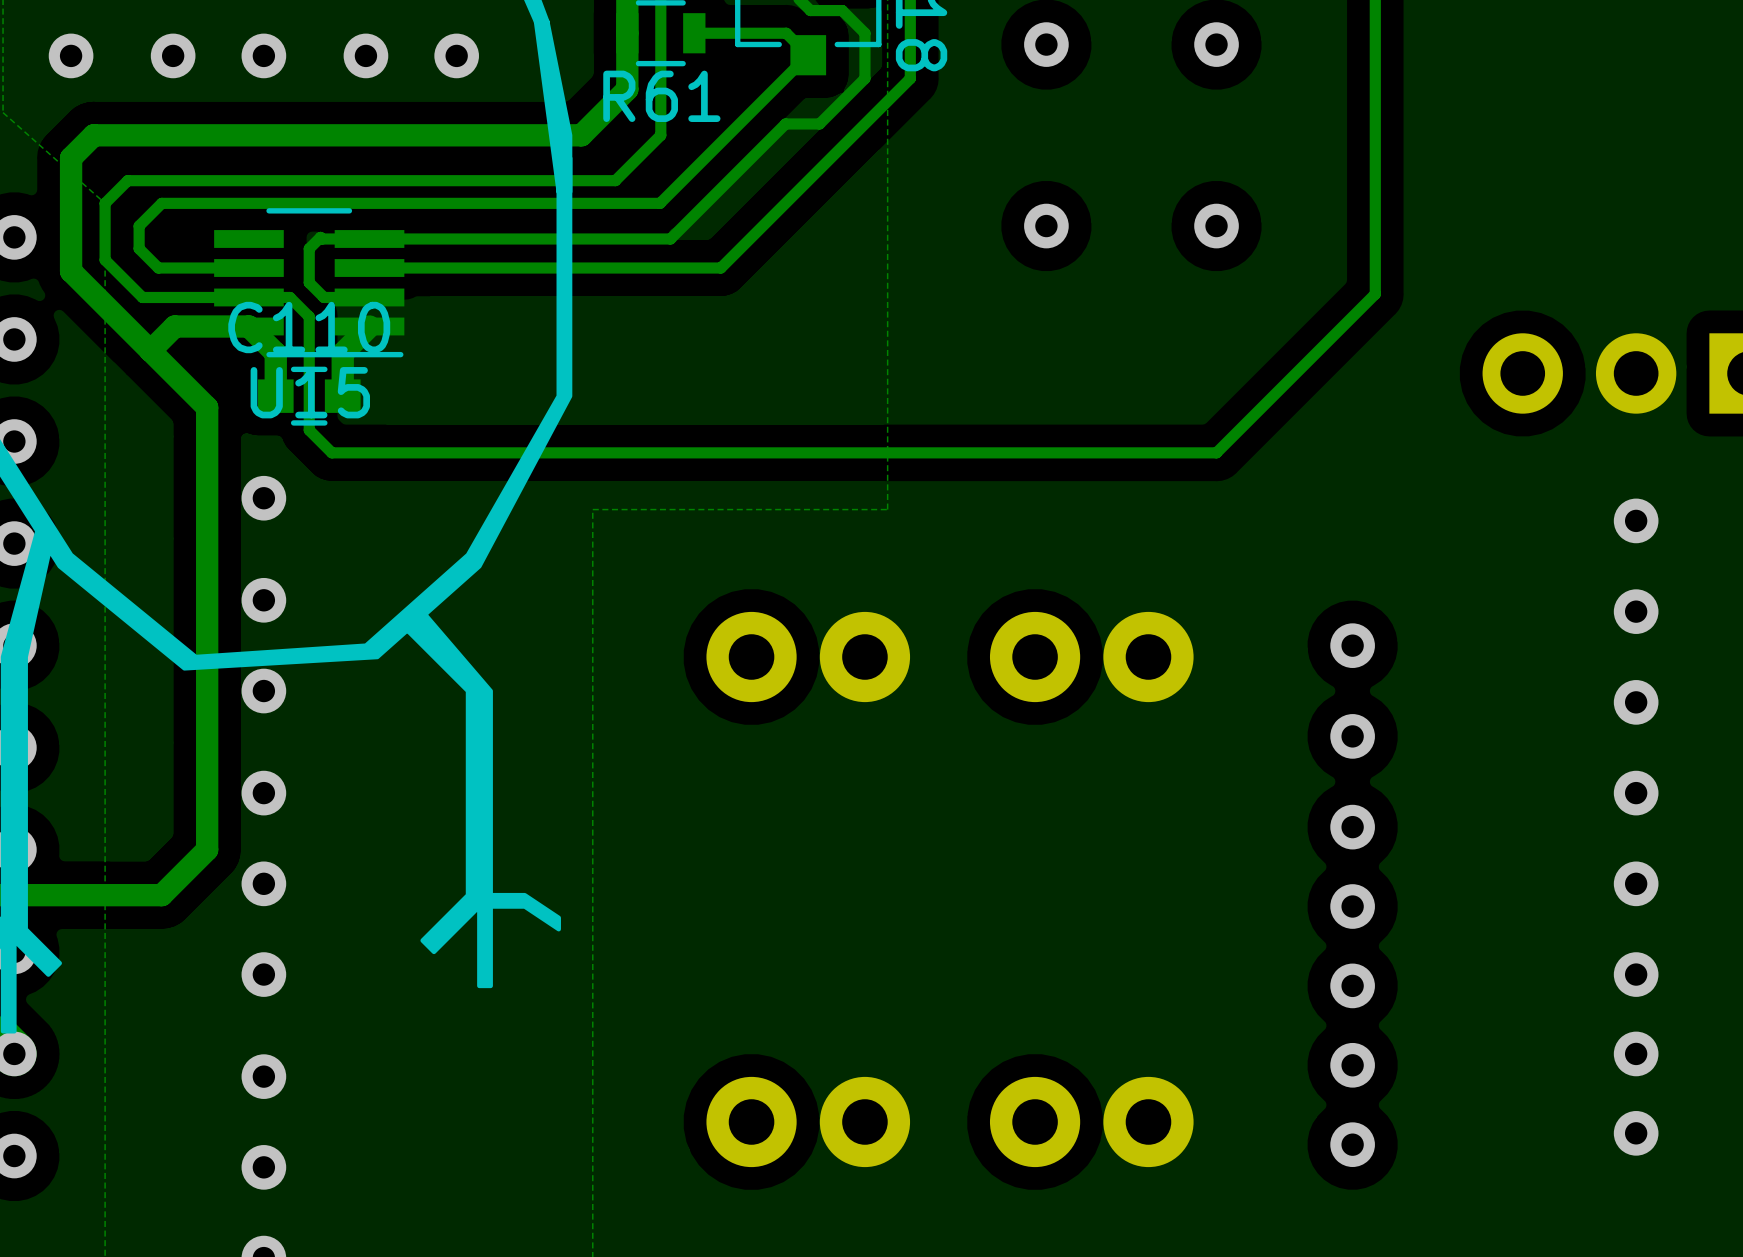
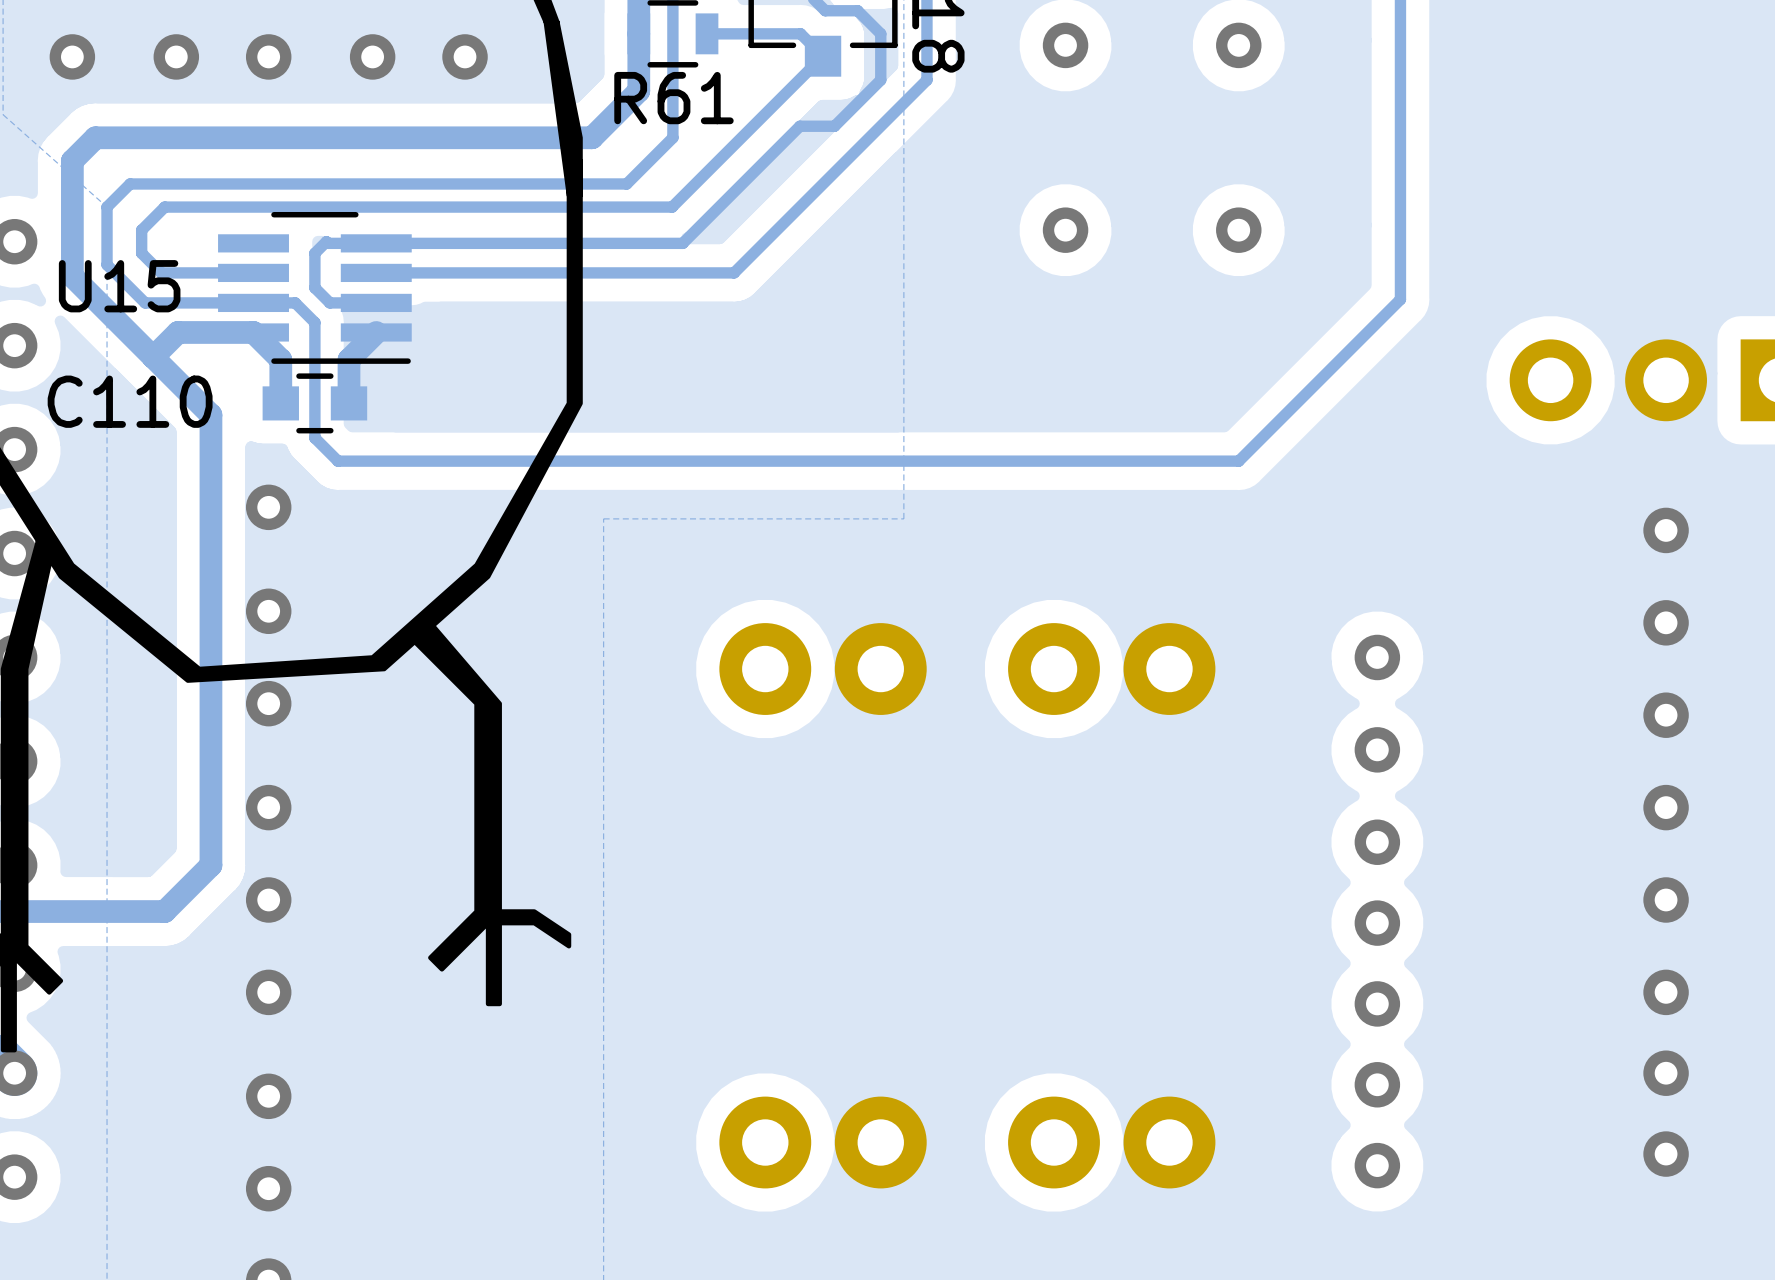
C110 name position: C110 (309, 327) -> C110 (130, 401)
U15 name position: U15 (310, 392) -> U15 (119, 286)

